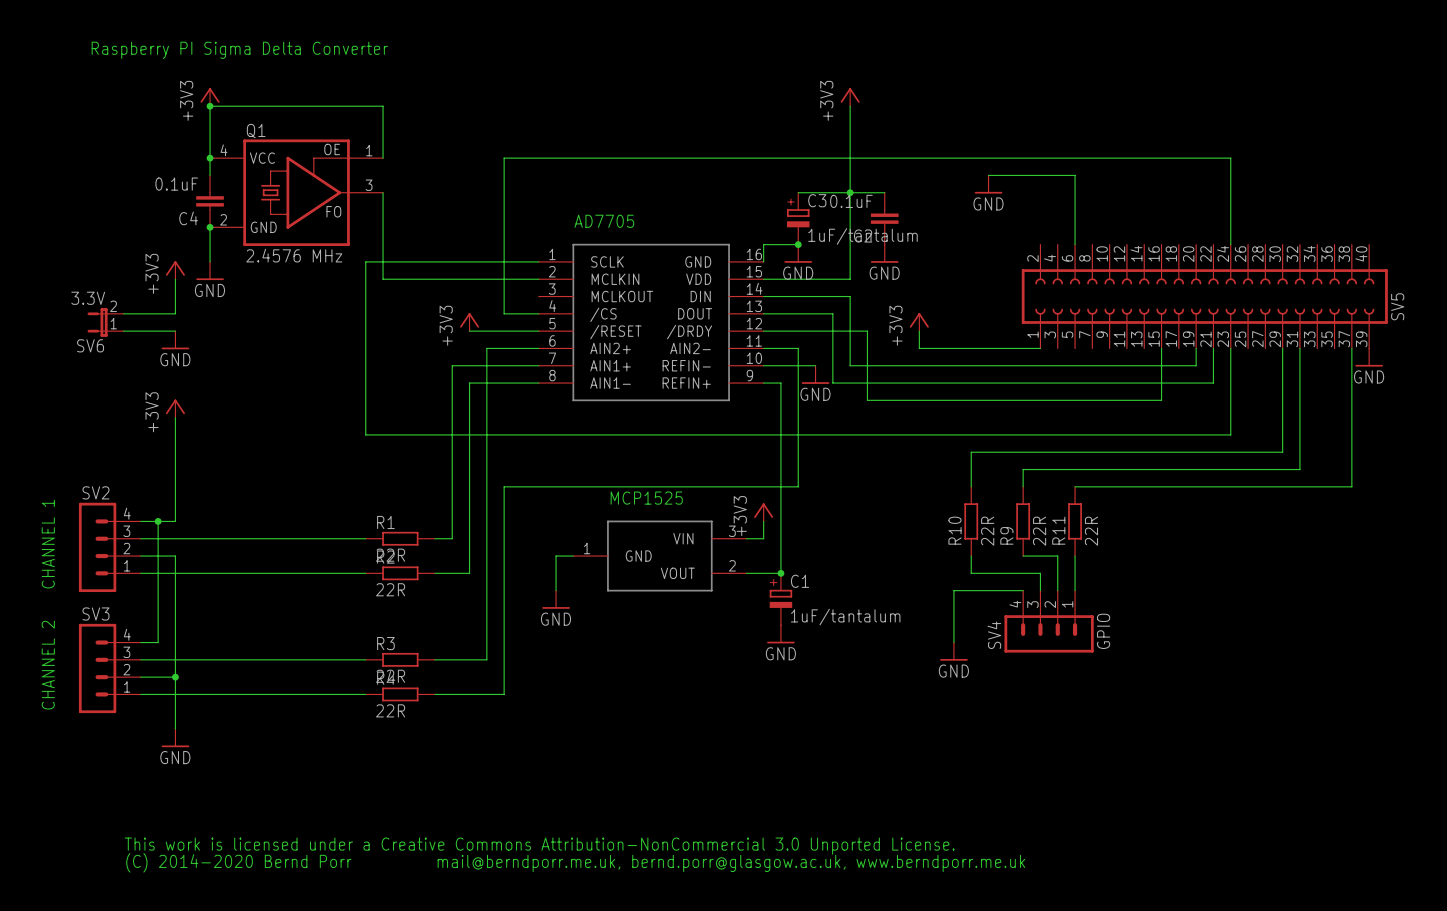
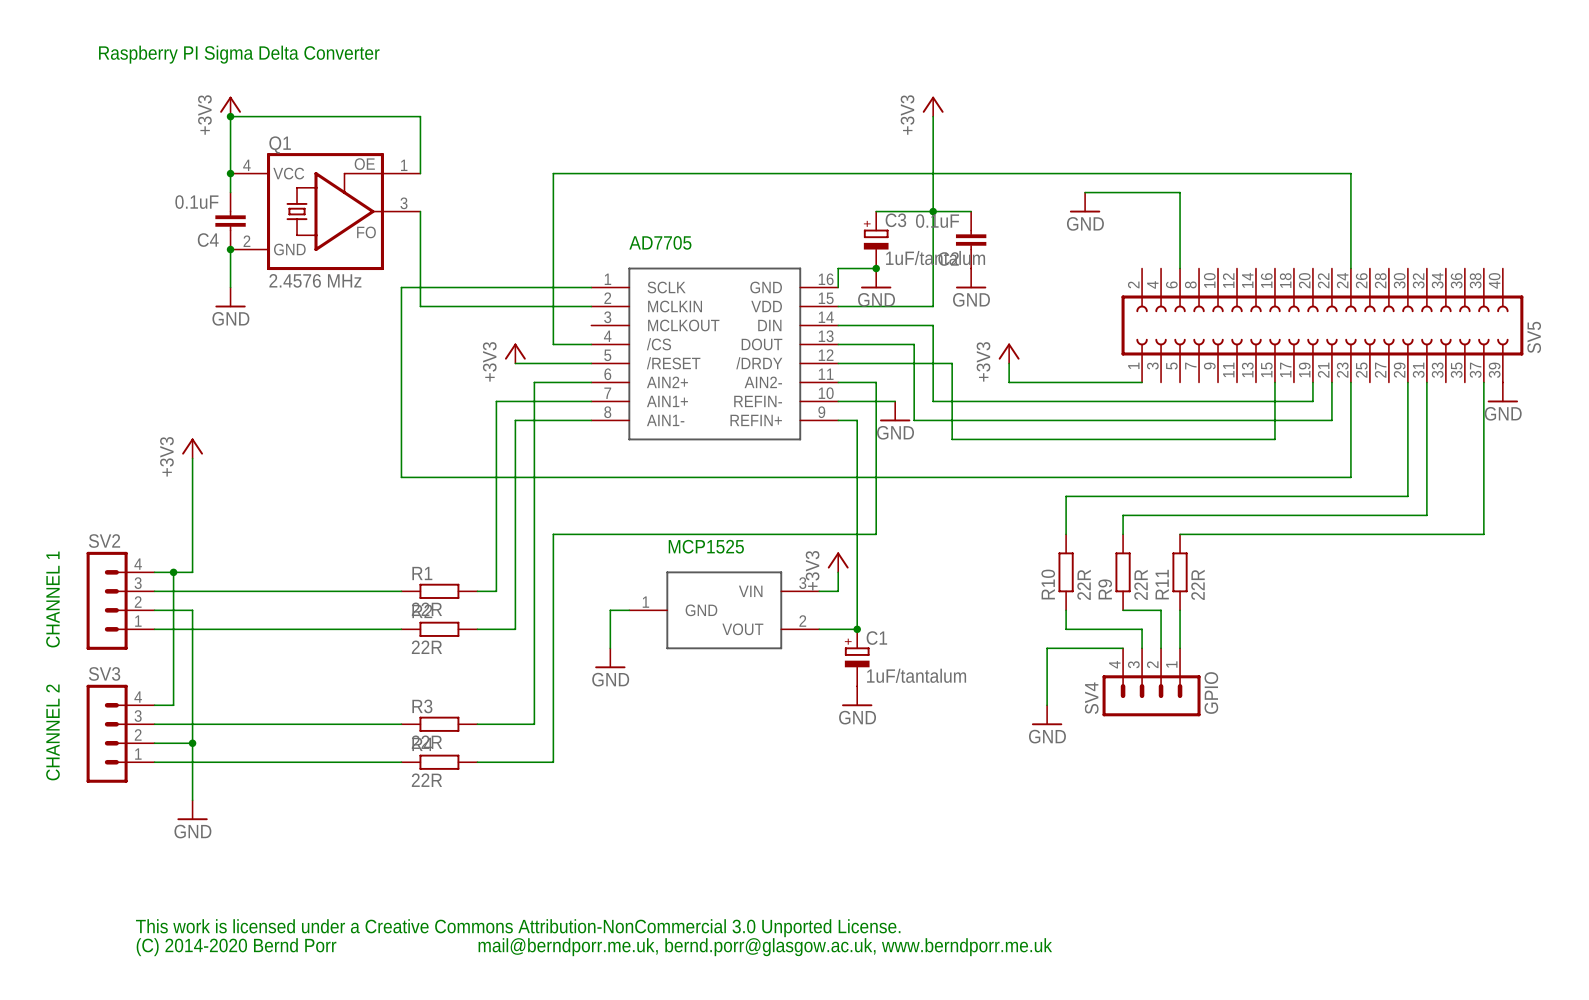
power symbol: +3V3 (175, 270) -> none
wire: (175, 279) (175, 313) (123, 313) -> none
SV6: 3.3V (105, 322) -> none
wire: (123, 331) (175, 331) -> none
power symbol: GND (175, 340) -> none

